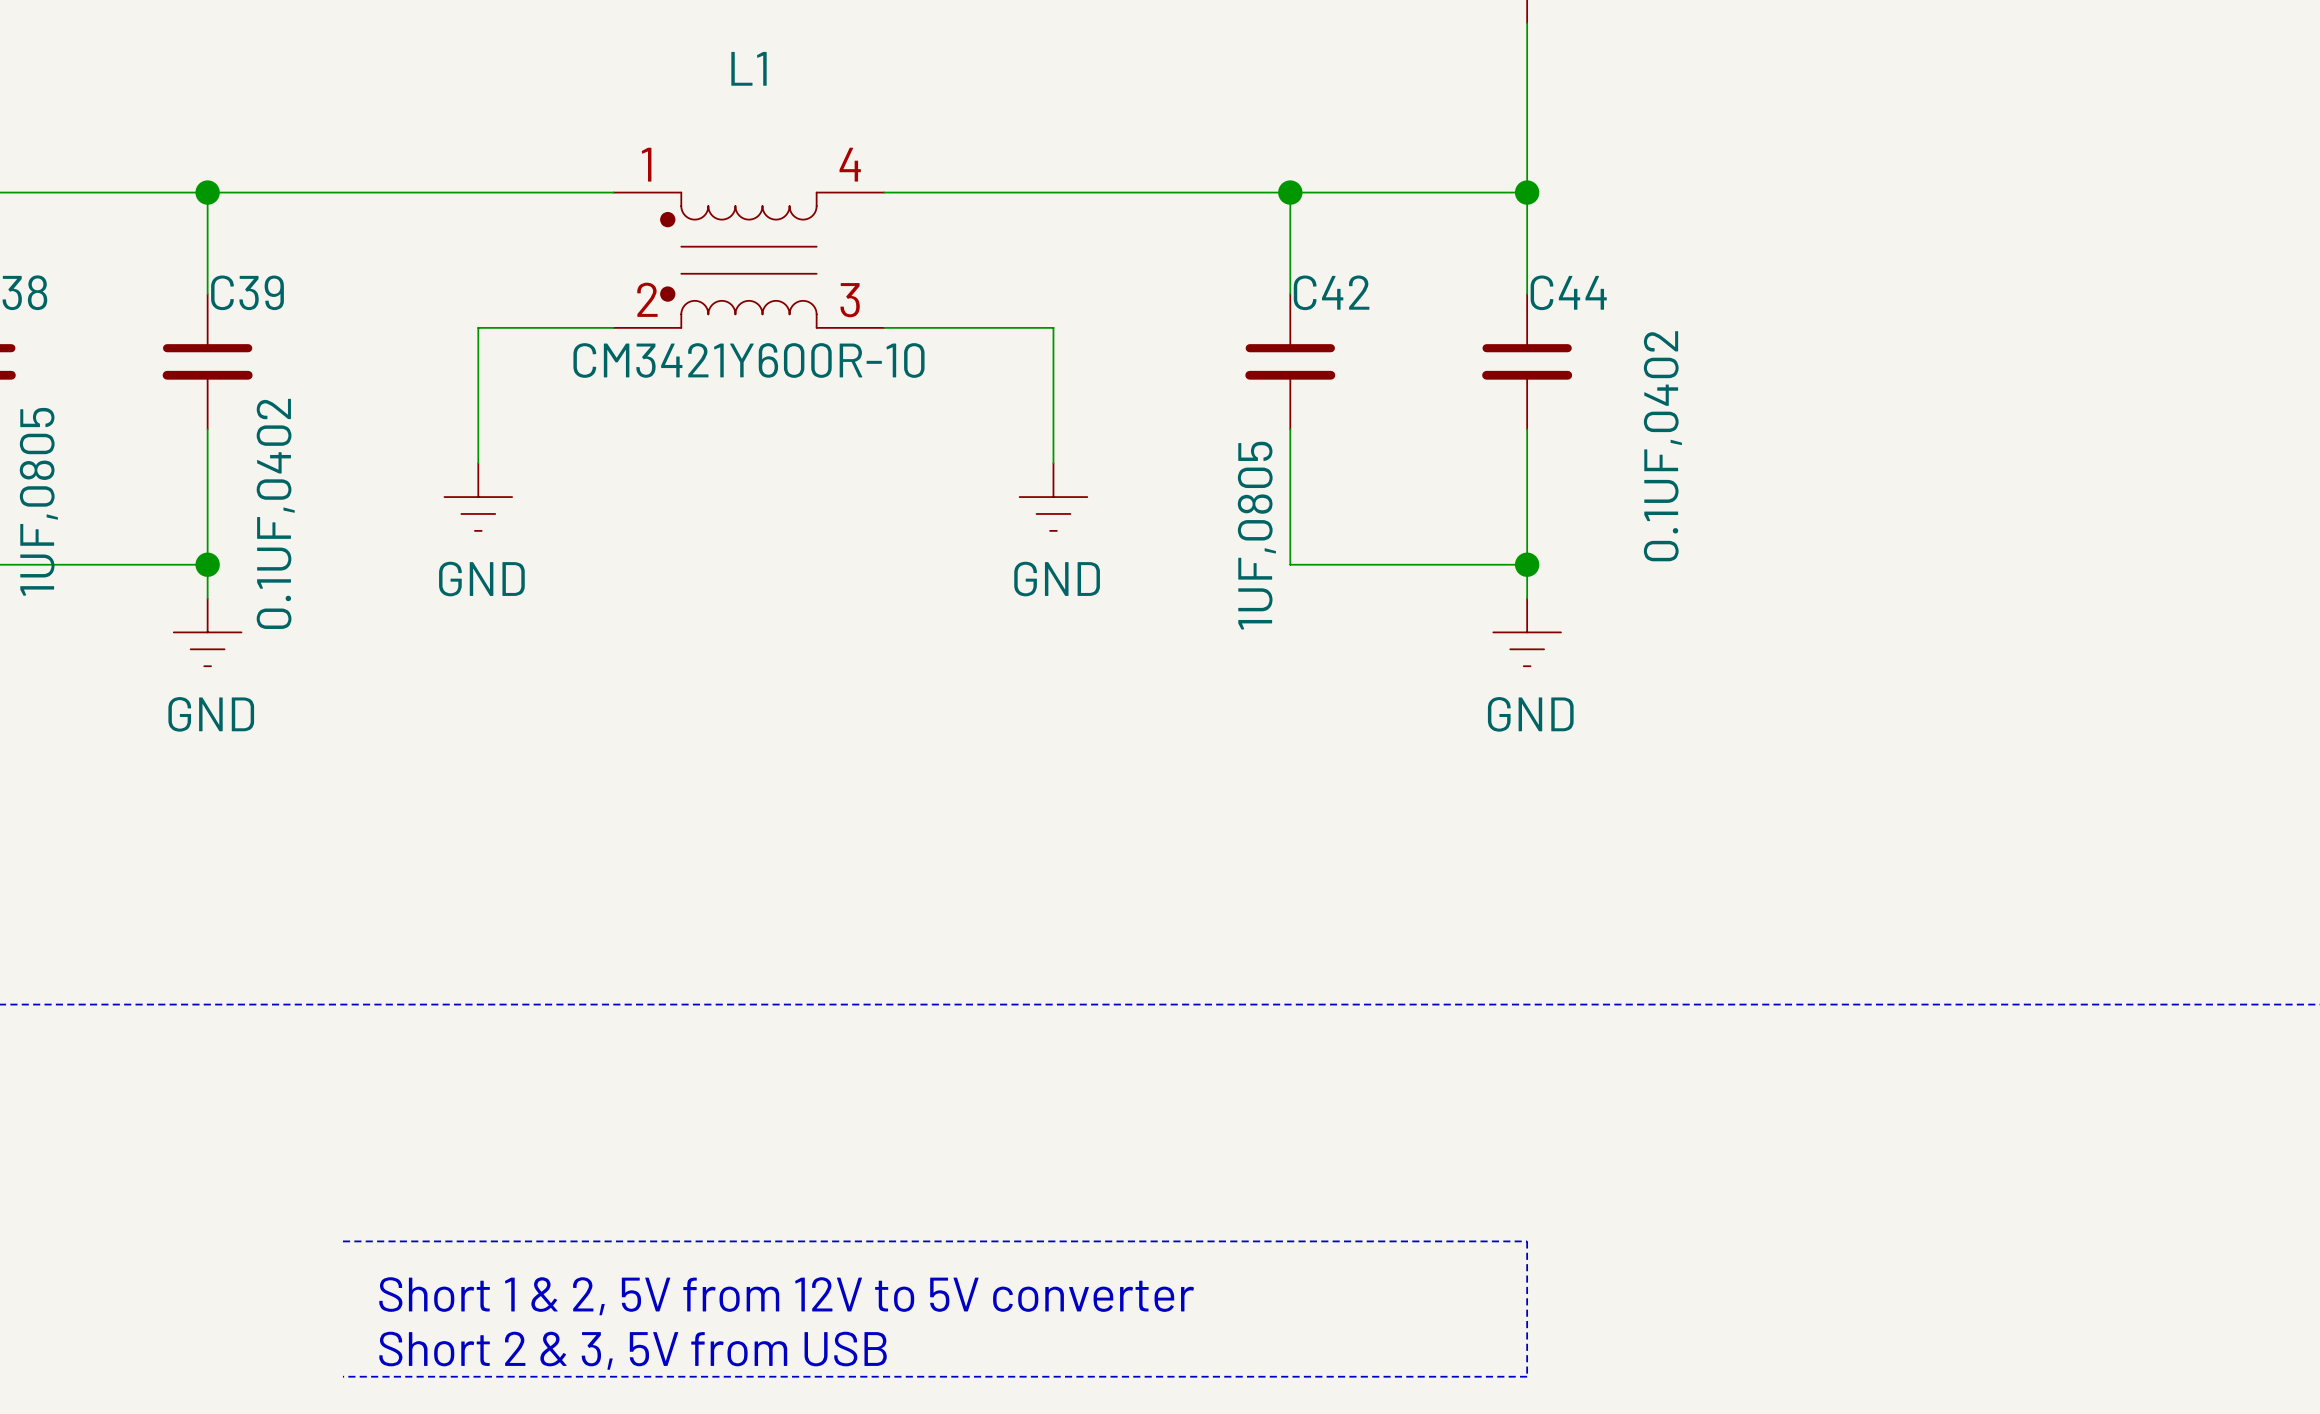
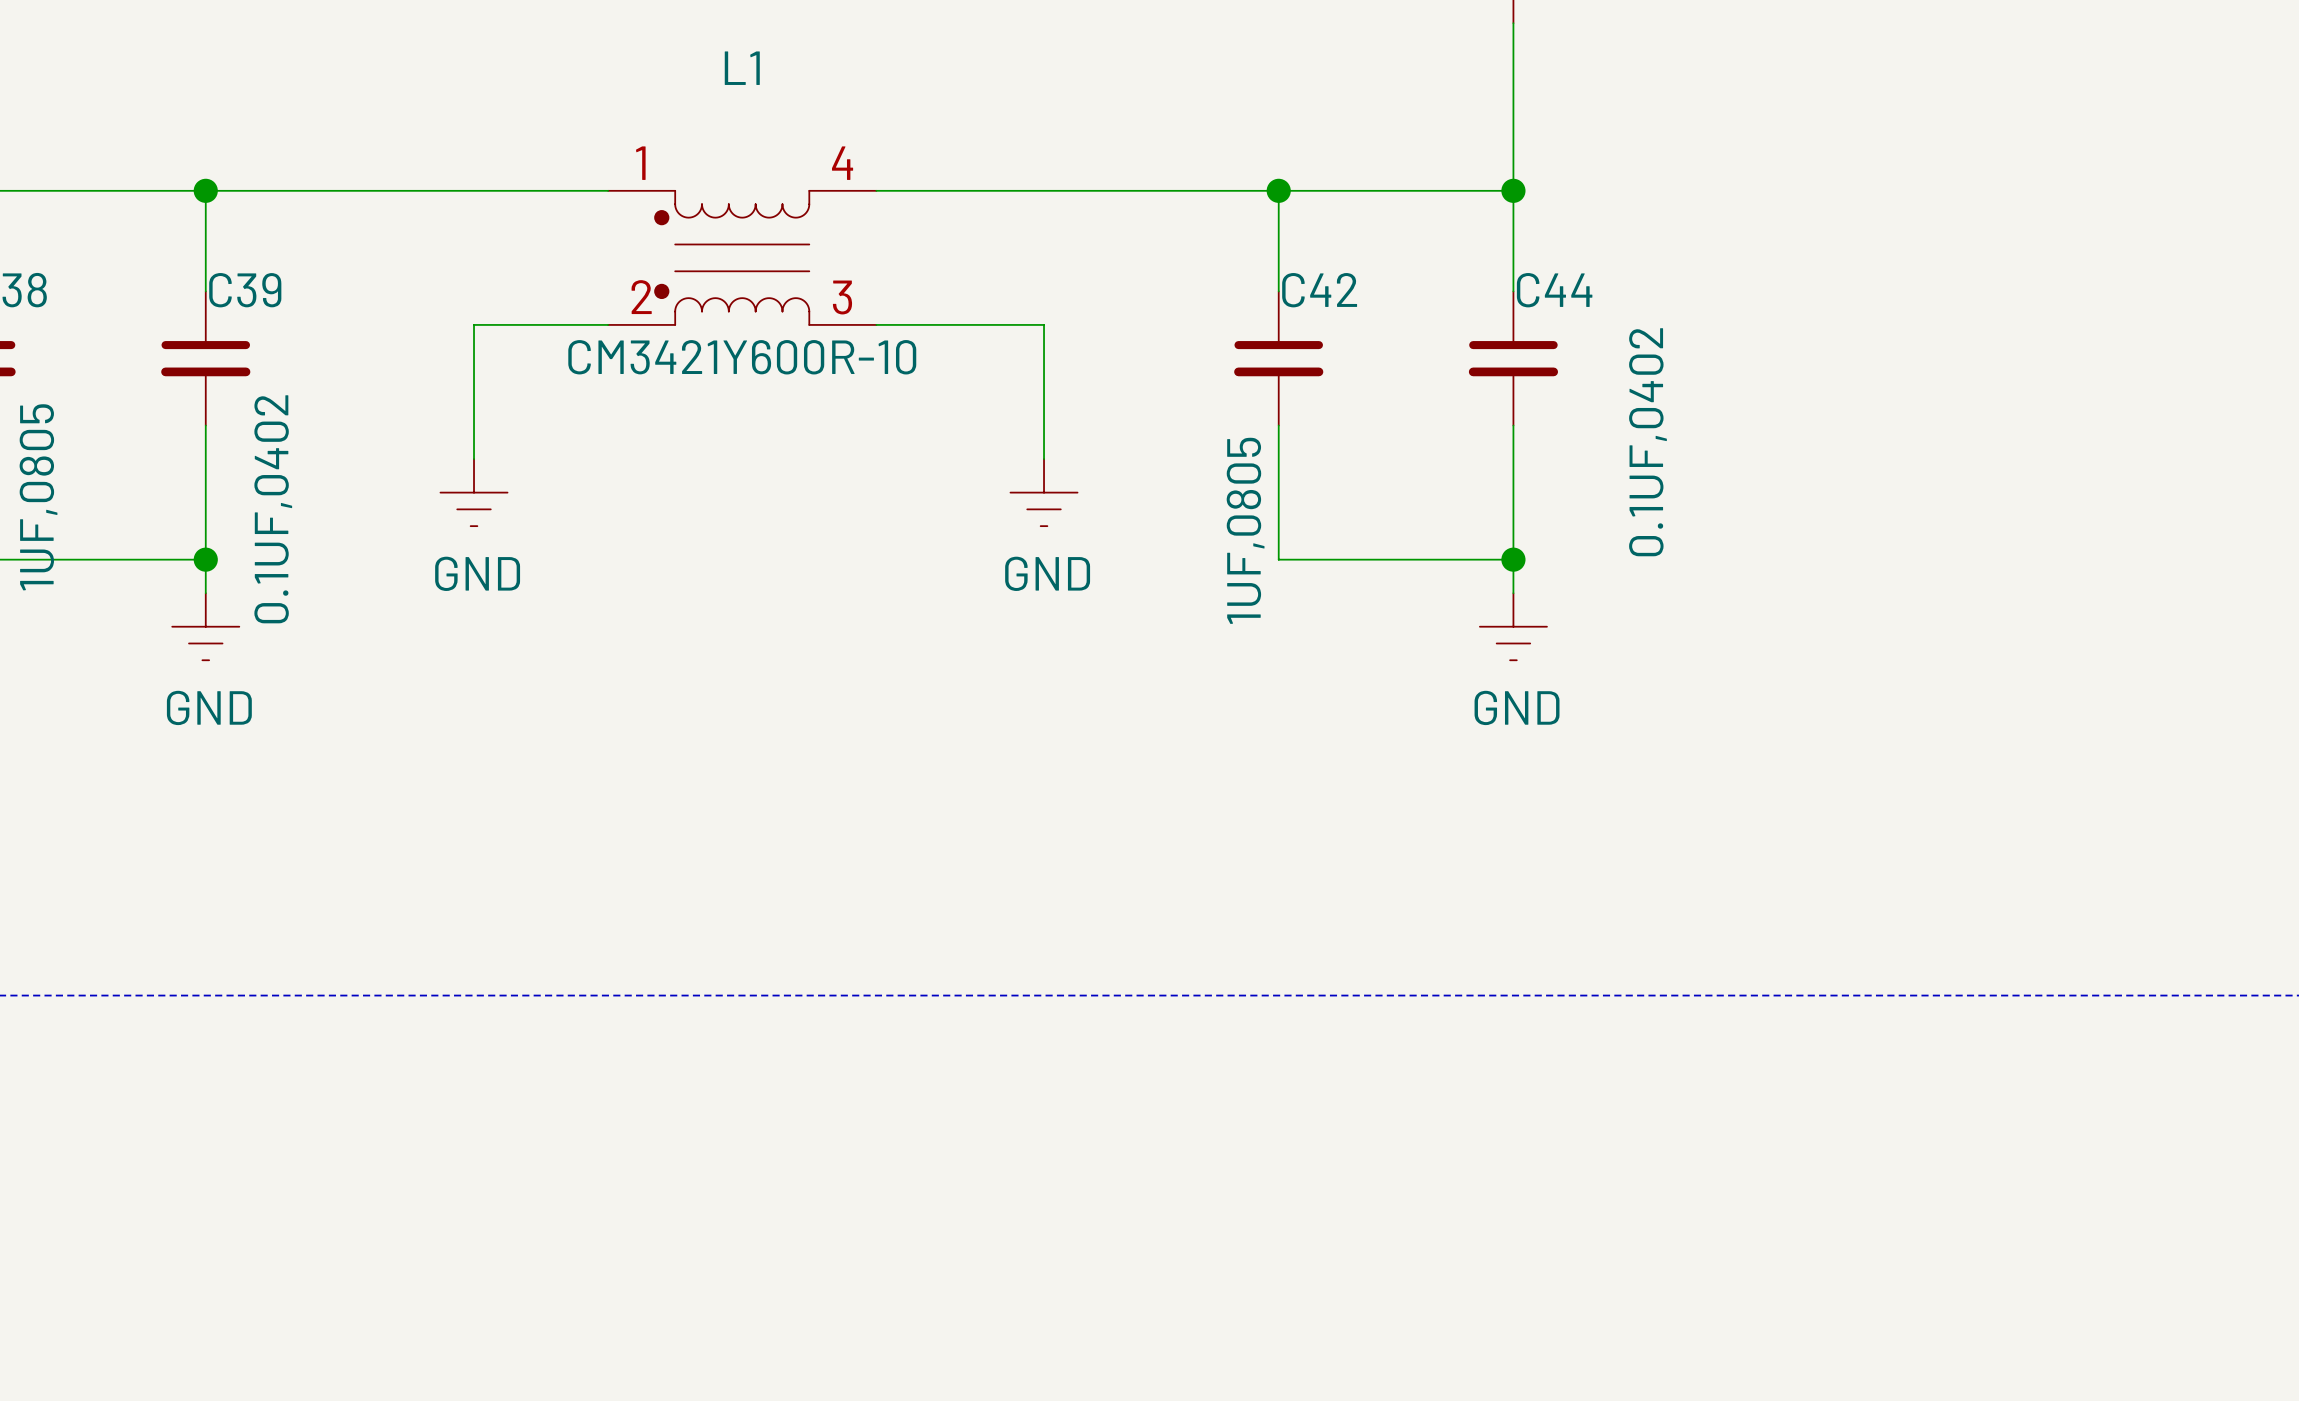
line: (342, 1241) (1527, 1241) (1527, 1376) (342, 1376) -> none
text: Short 1 & 2, 5V from 12V to 5V converter (786, 1296) -> none
text: Short 2 & 3, 5V from USB (633, 1350) -> none

